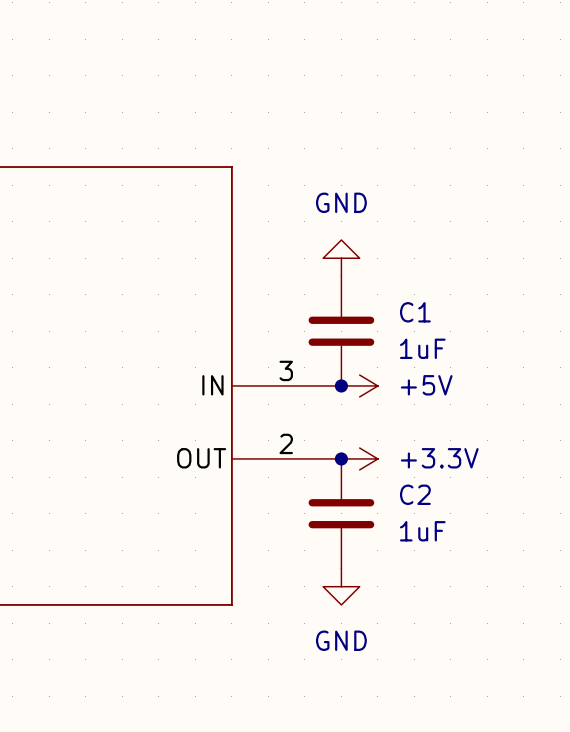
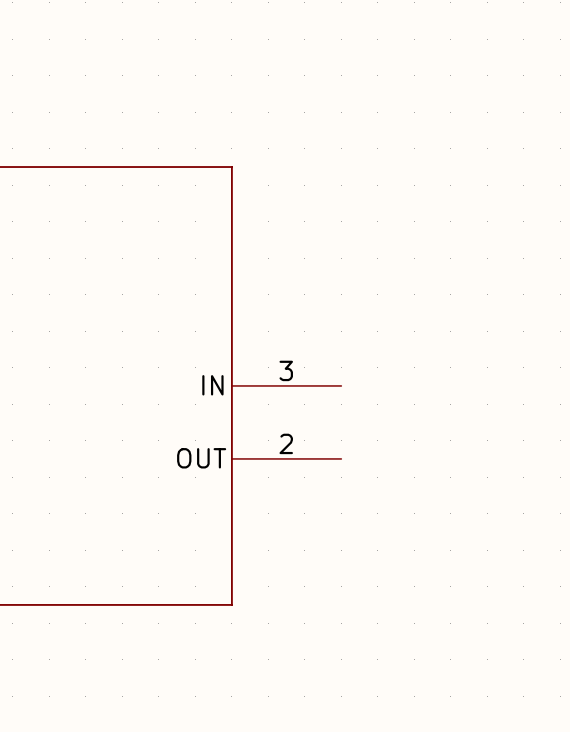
power symbol: GND (341, 258) -> none
C1: 1uF (341, 331) -> none
junction: (341, 385) -> none
power symbol: +5V (359, 385) -> none
junction: (341, 458) -> none
power symbol: +3.3V (359, 458) -> none
C2: 1uF (341, 513) -> none
power symbol: GND (341, 586) -> none

